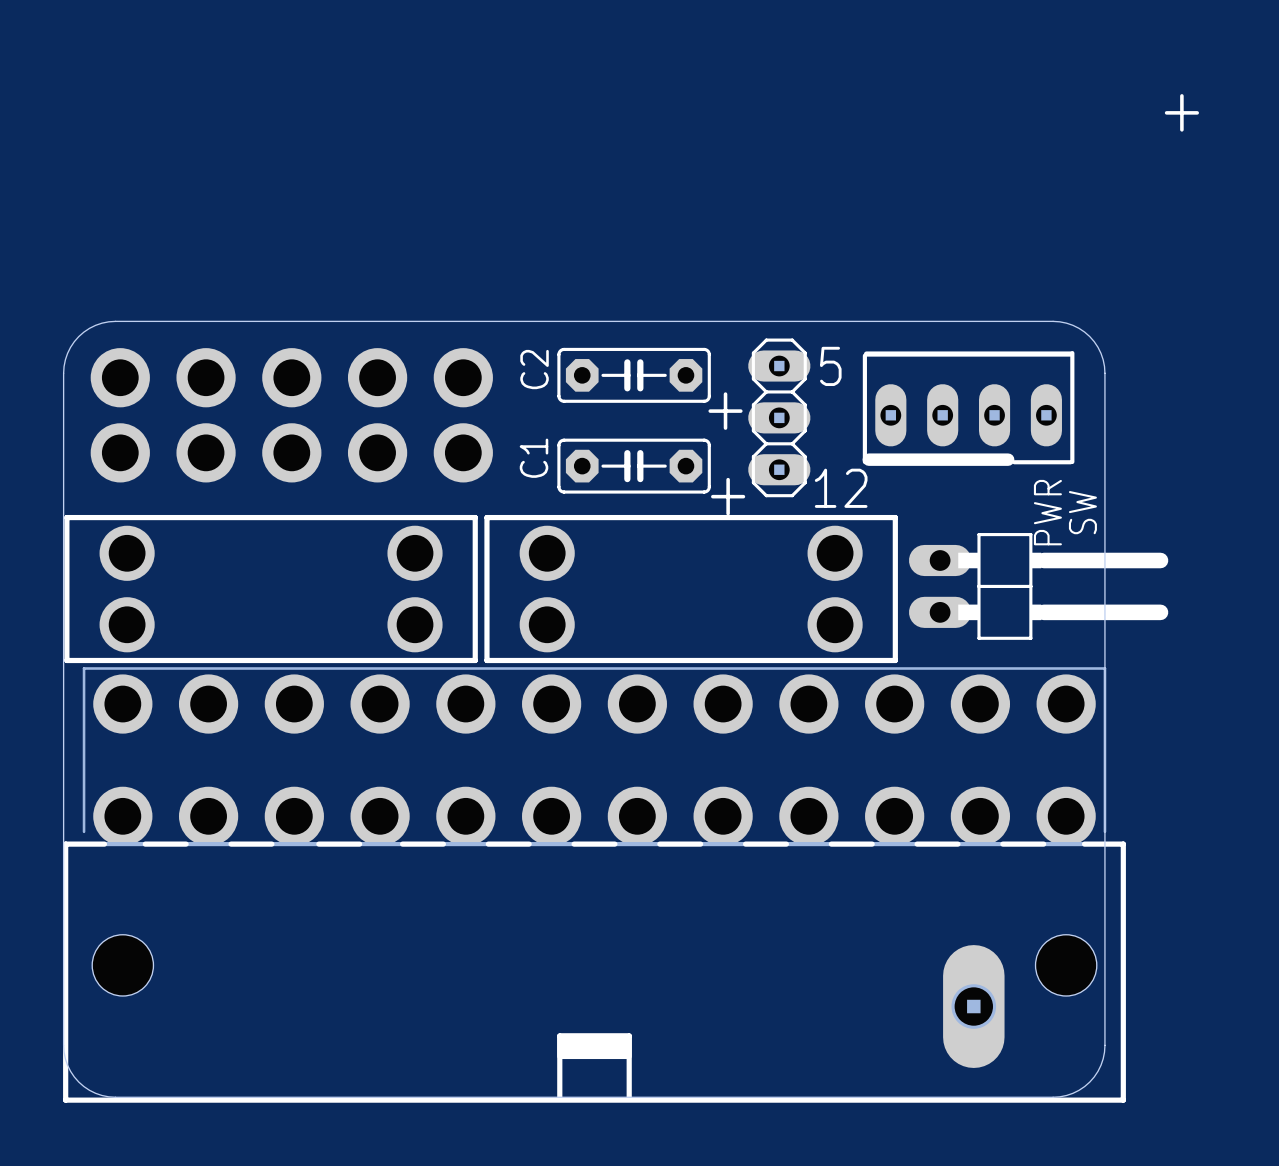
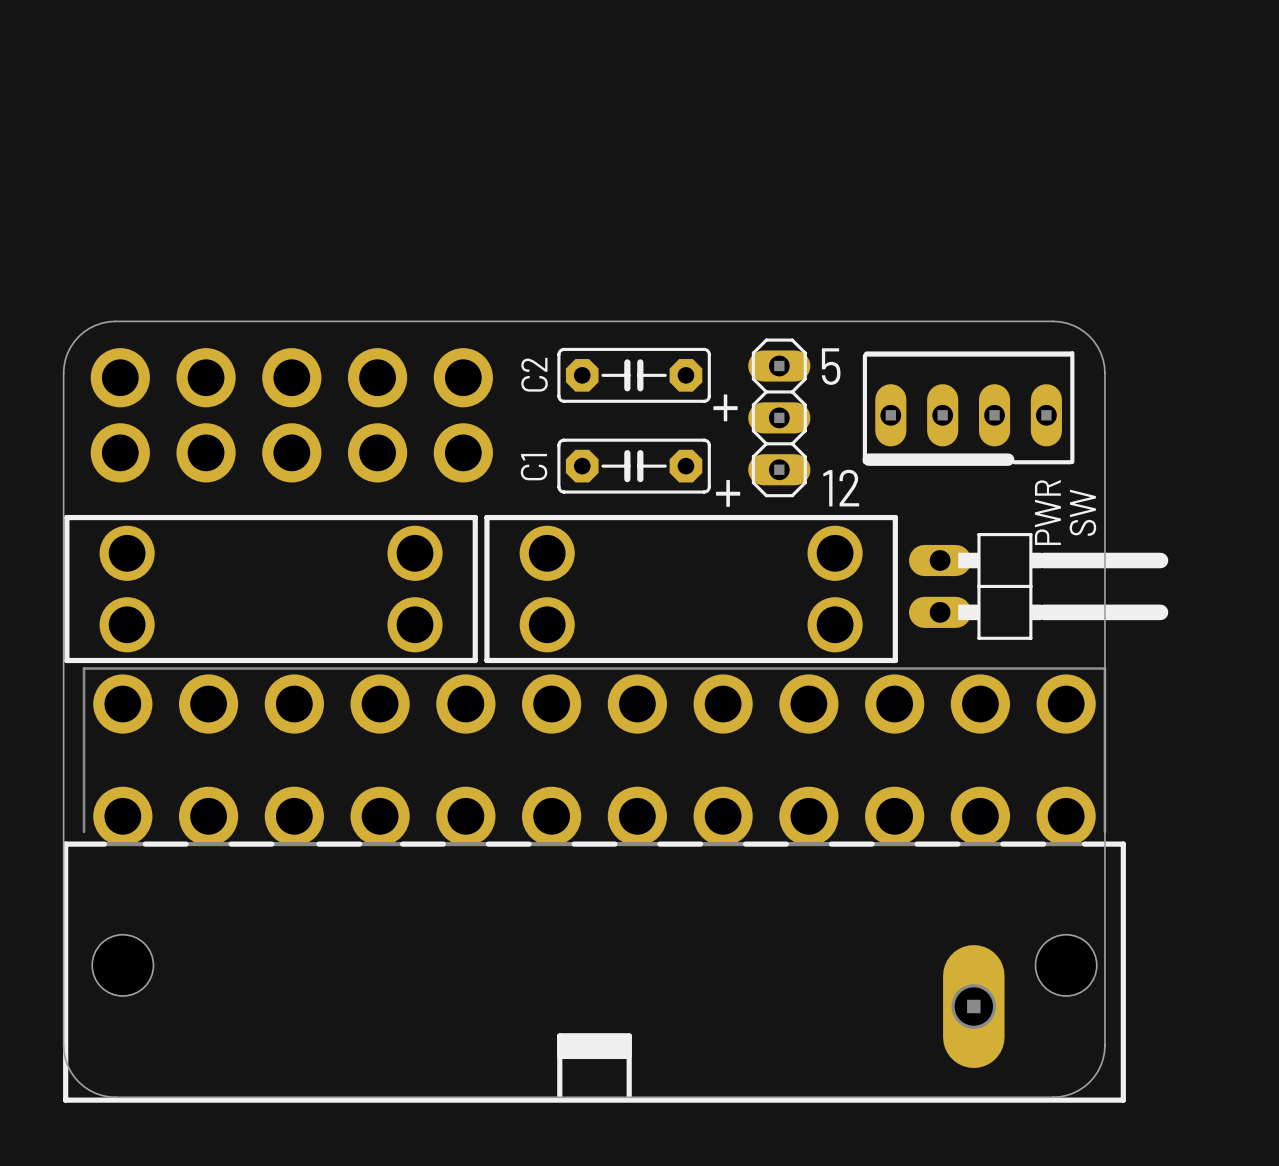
text: + (1181, 112) -> none

